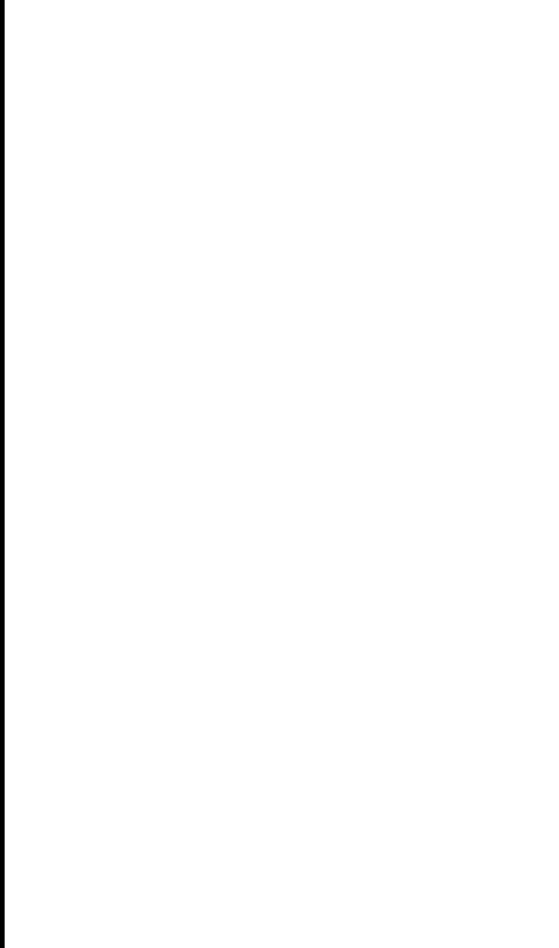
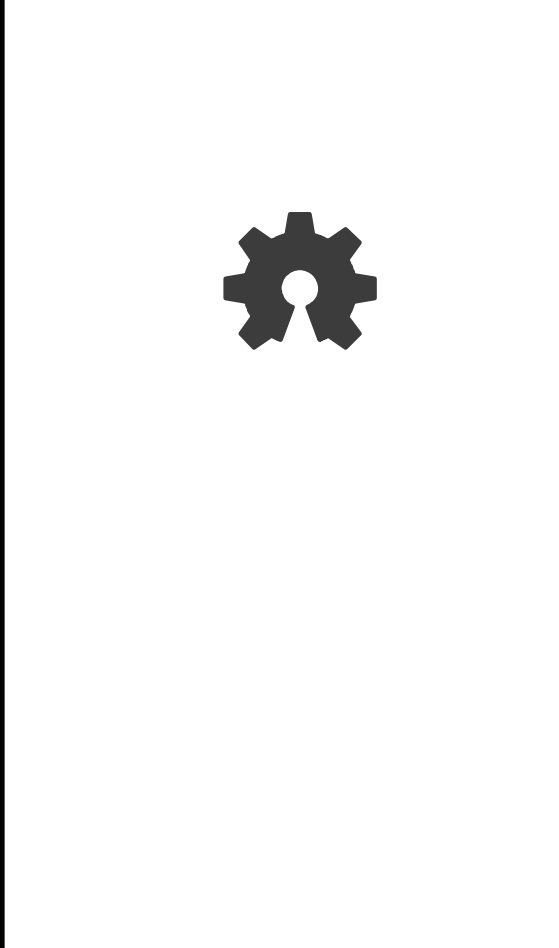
drawing: none -> [223, 212, 377, 350]

